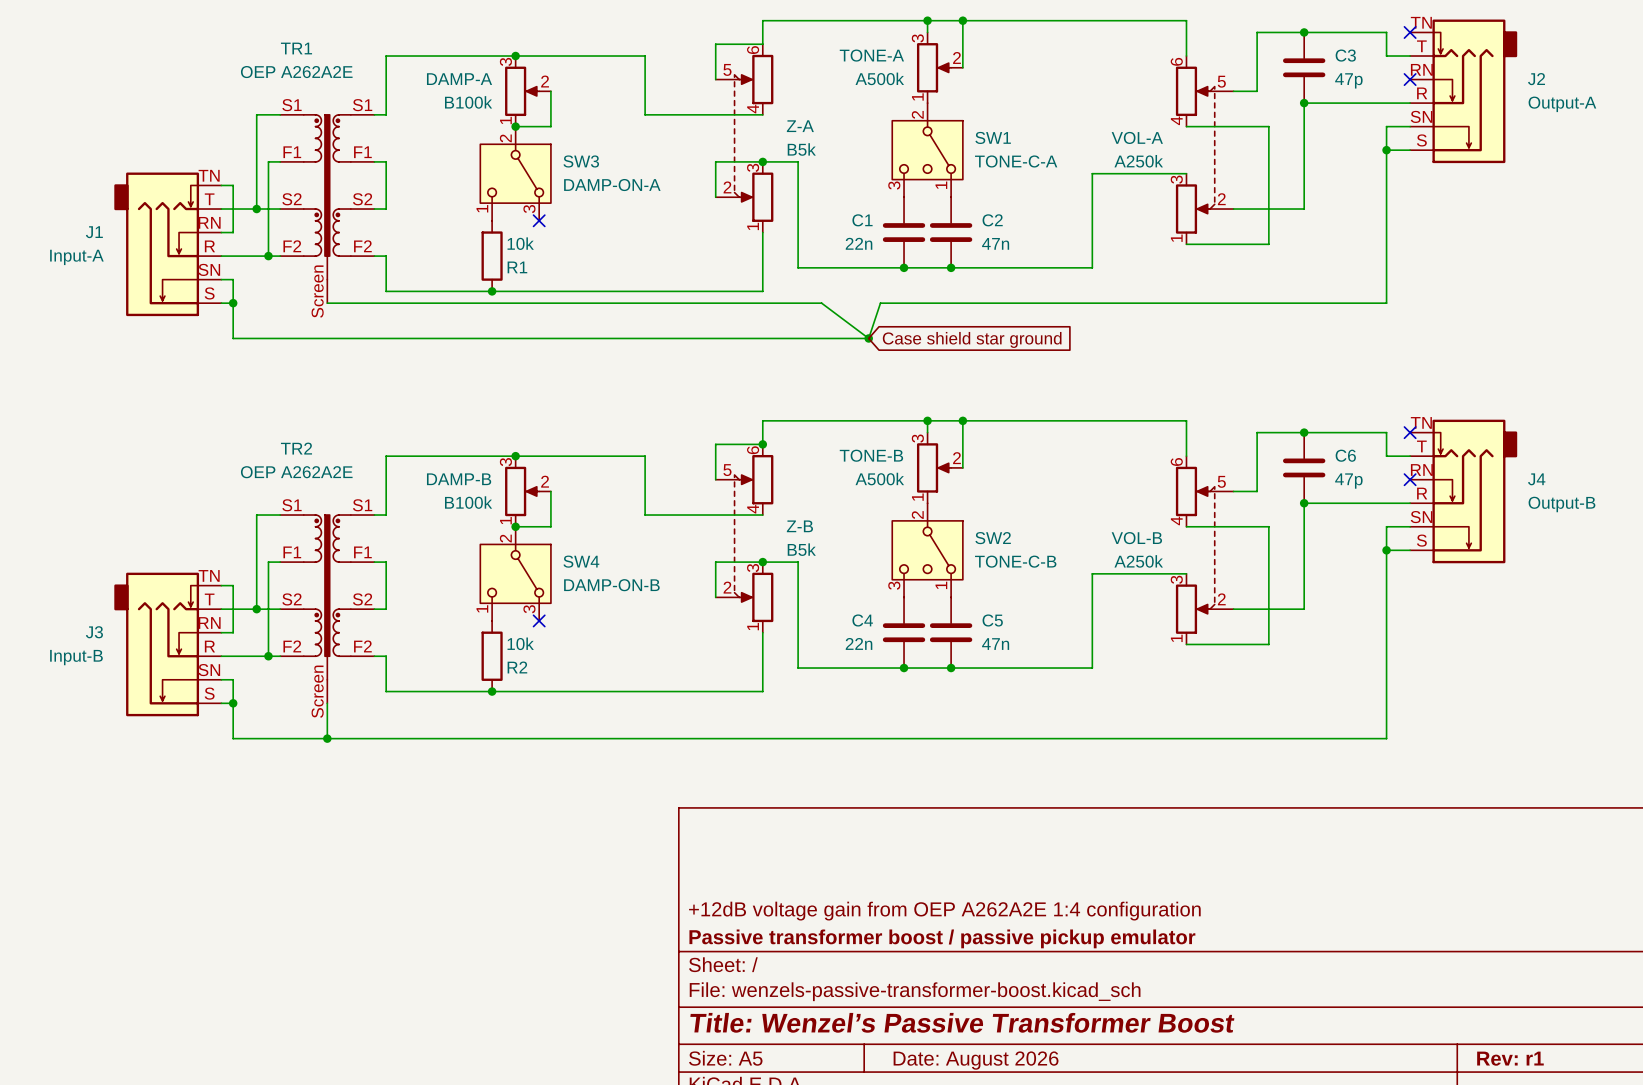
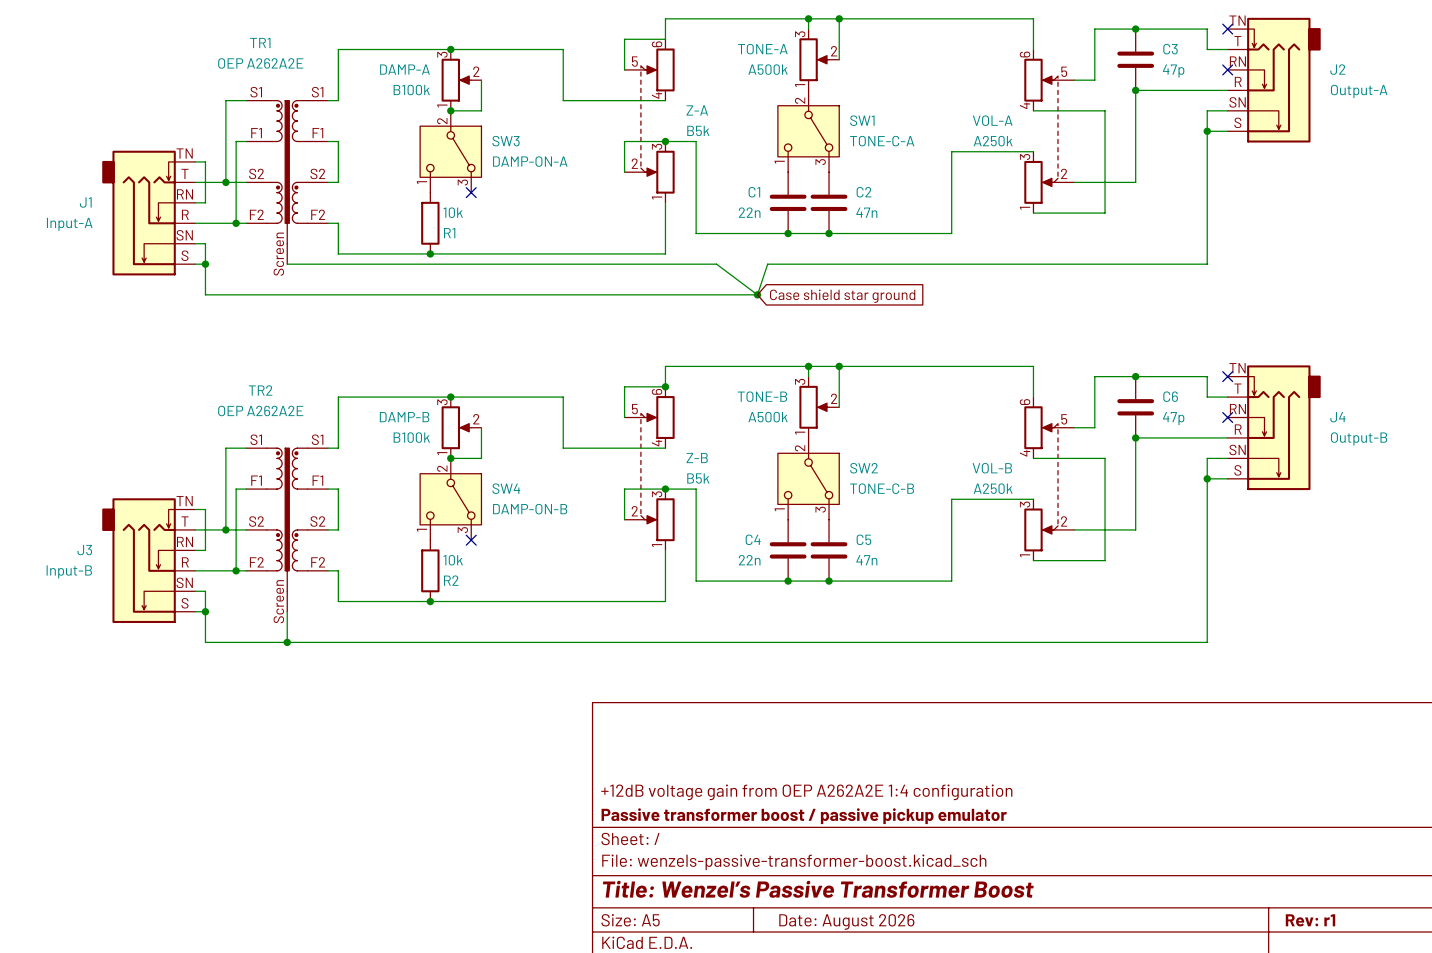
SW1 symbol: [892, 103, 963, 198] -> [777, 90, 840, 173]
SW2 symbol: [892, 503, 963, 598] -> [777, 437, 840, 520]

